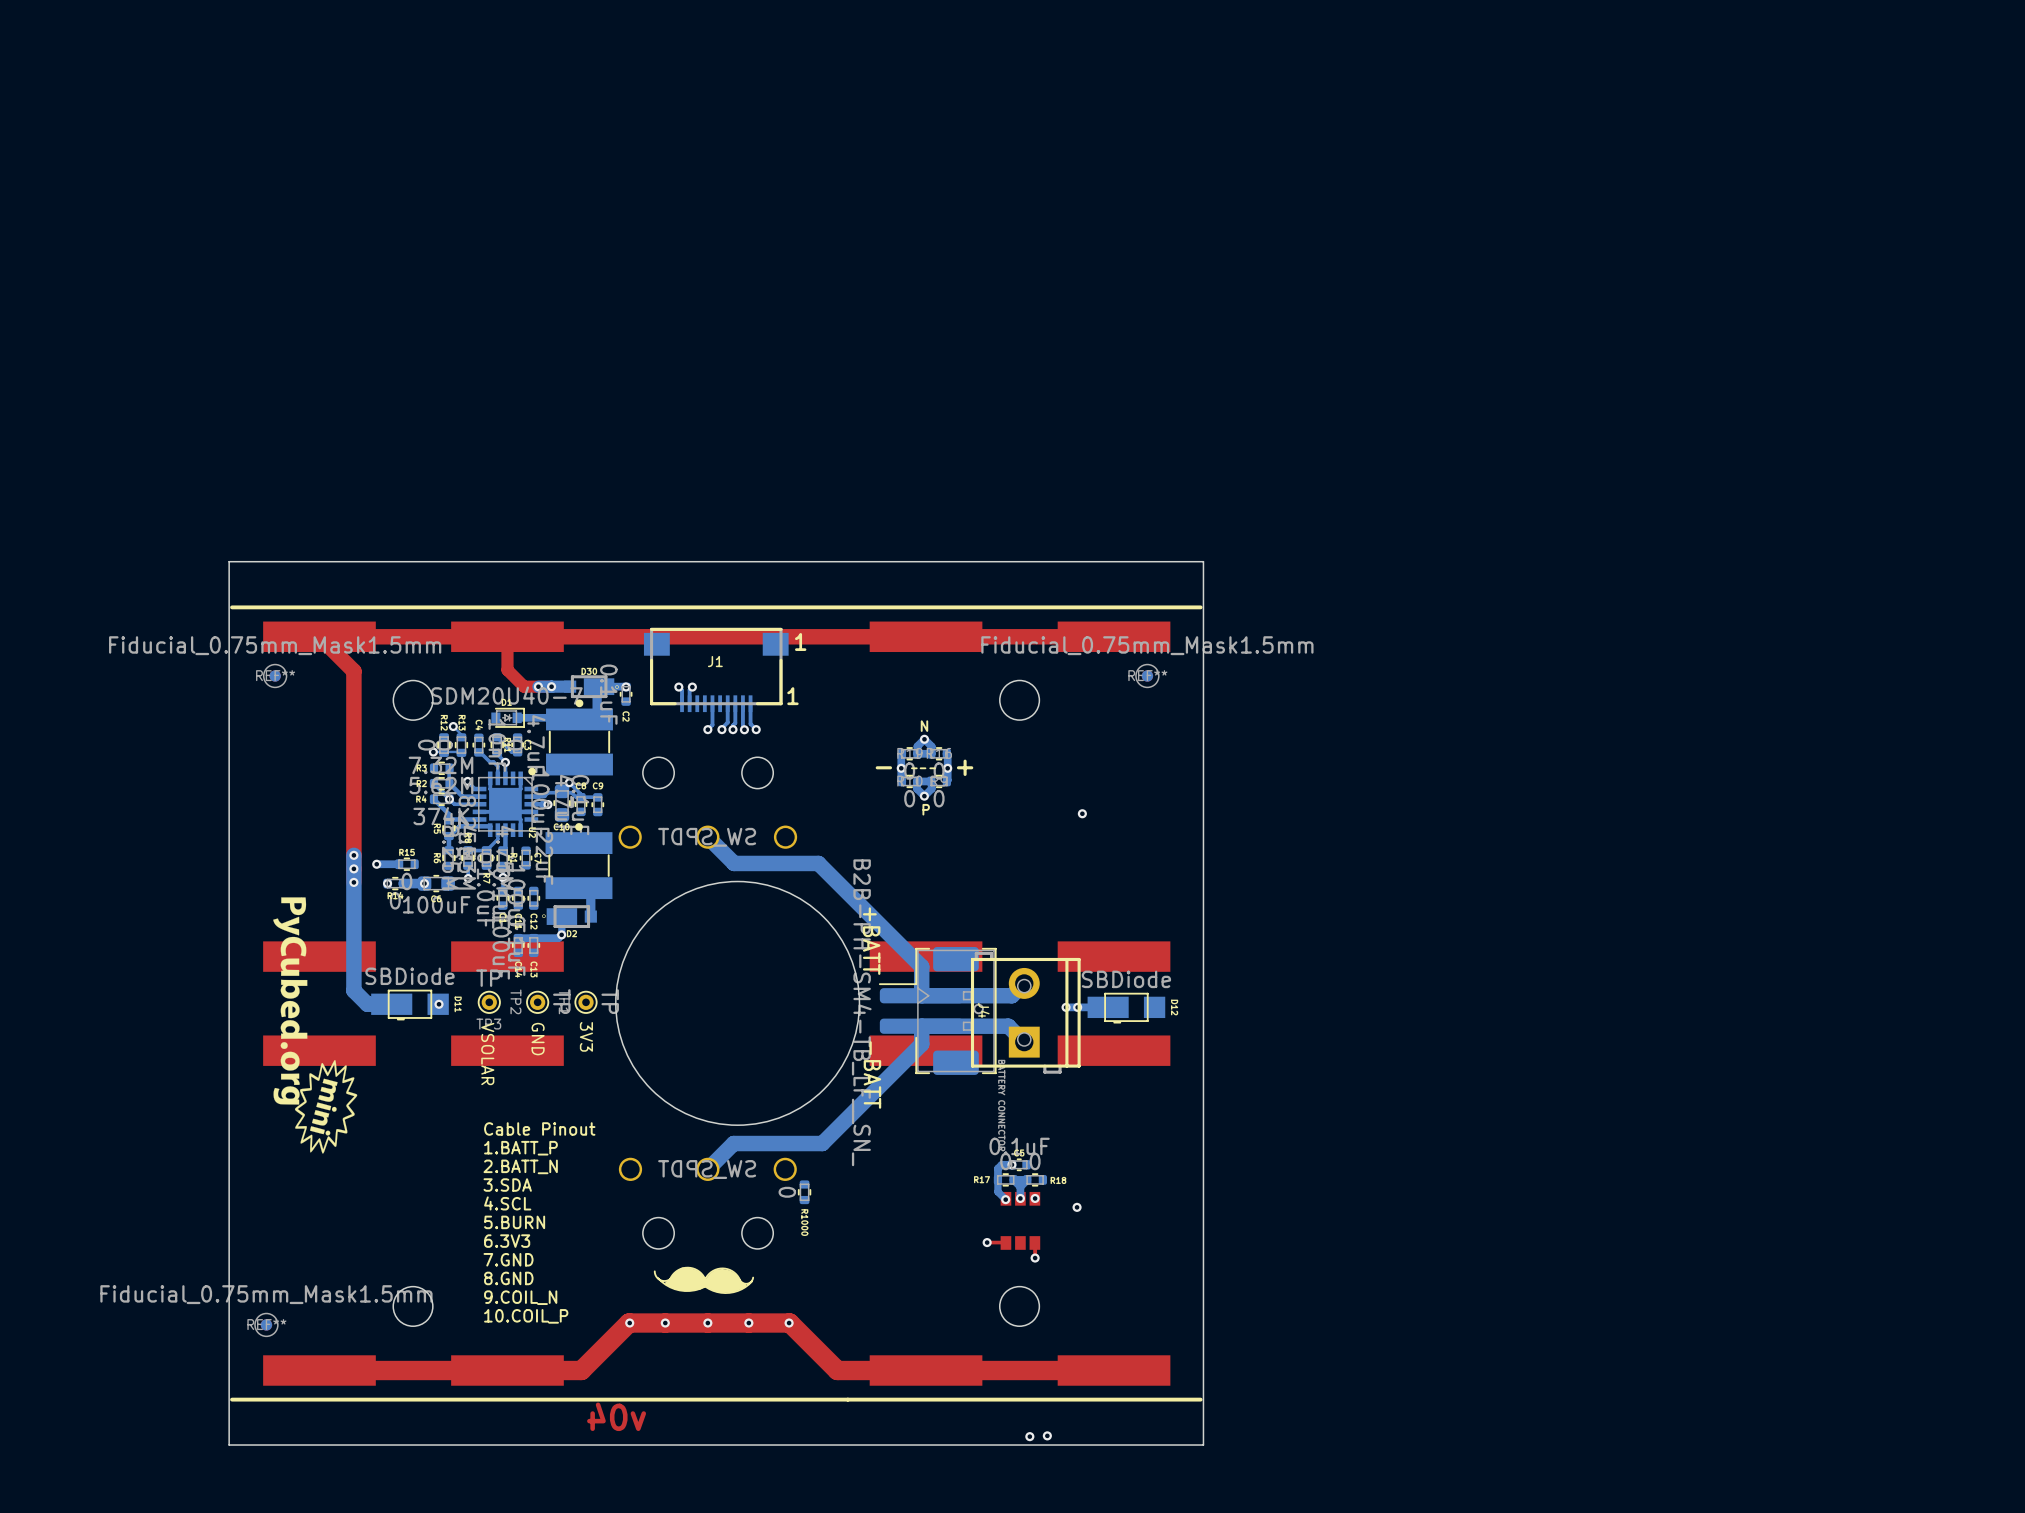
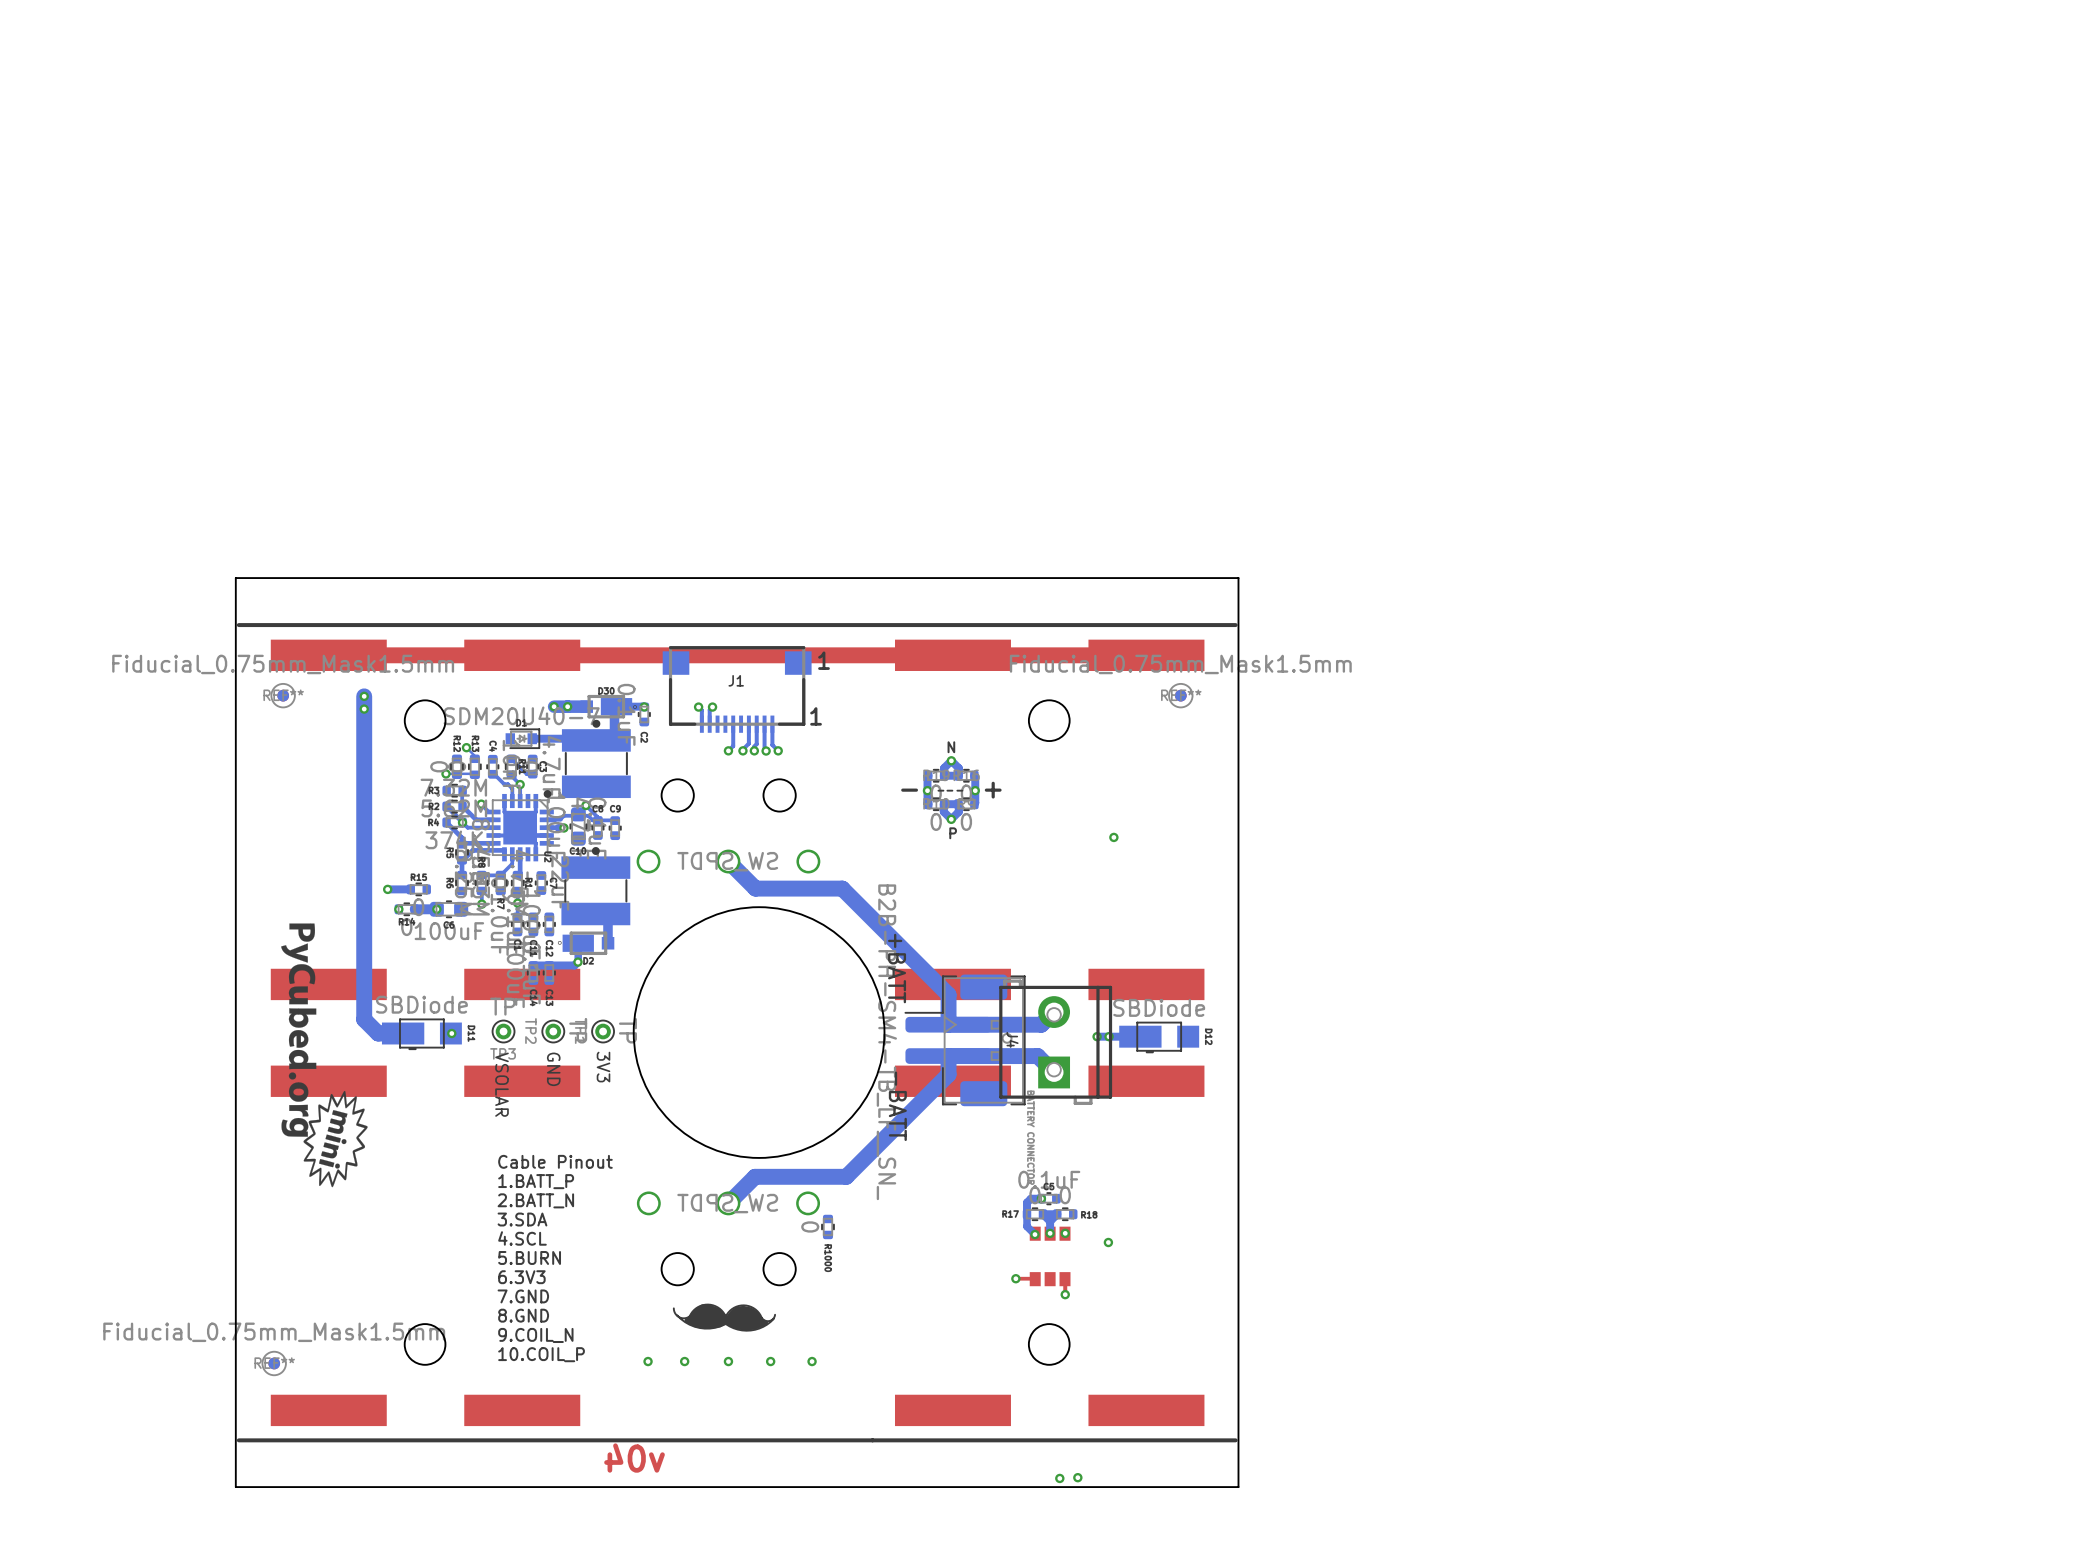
top track: (319, 636) (353, 671) (353, 882) -> none
top track: (507, 636) (507, 670) (524, 686) (551, 686) -> none
bottom track: none -> (364, 696) (364, 880)
via: none -> (364, 696)
via: none -> (364, 709)
via: (353, 855) -> none
via: (353, 868) -> none
via: (353, 882) -> none
top track: (1114, 1370) (837, 1370) (789, 1323) (628, 1323) (581, 1370) (319, 1370) -> none

